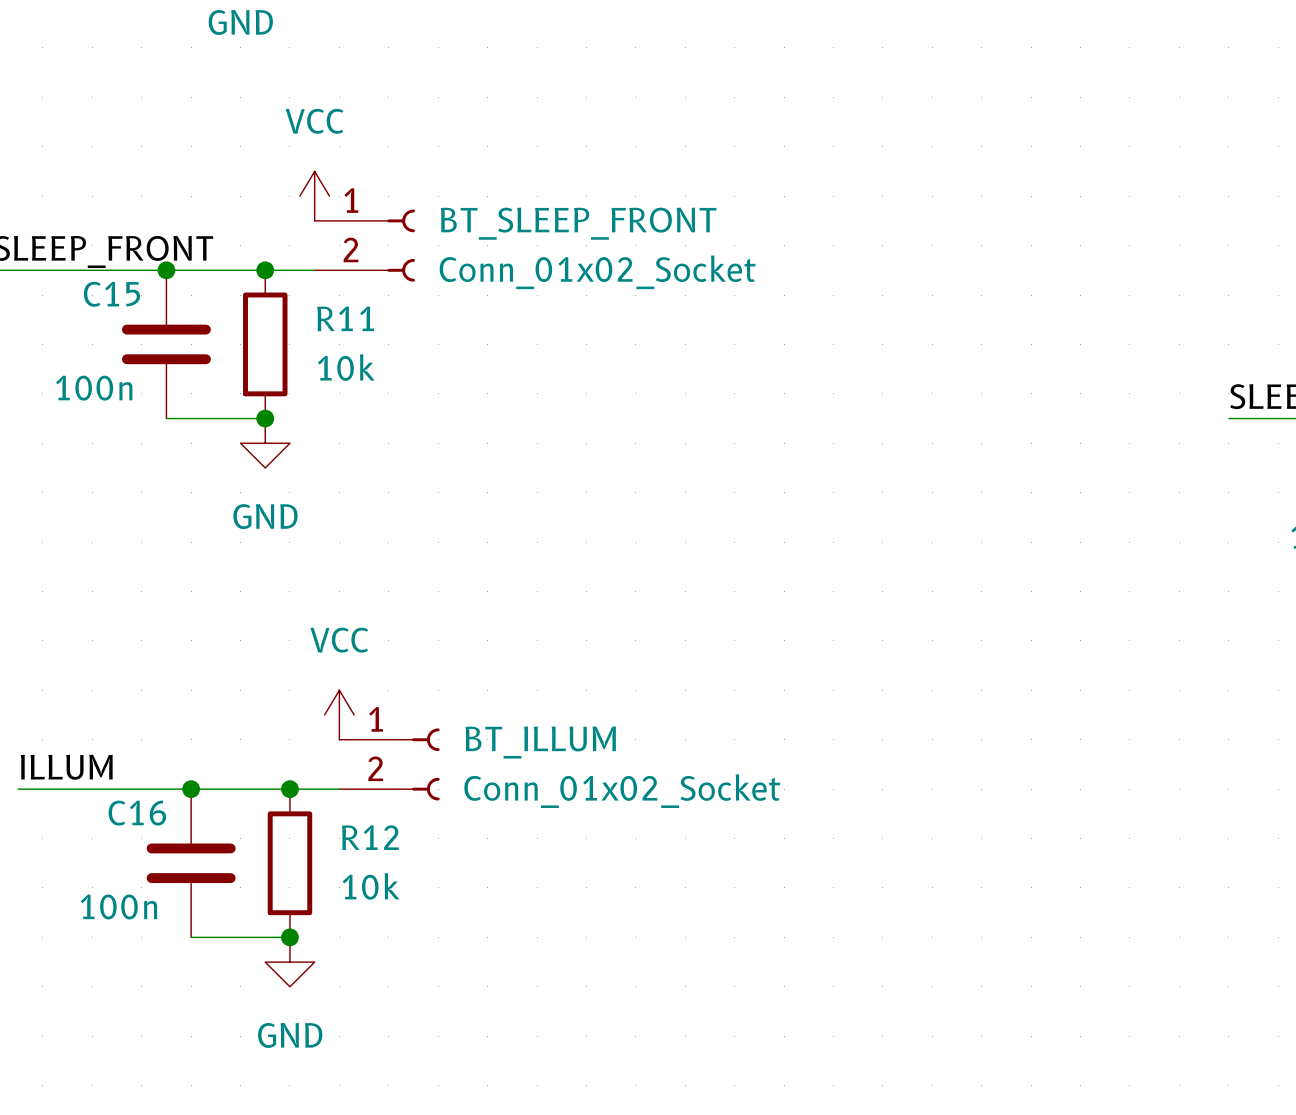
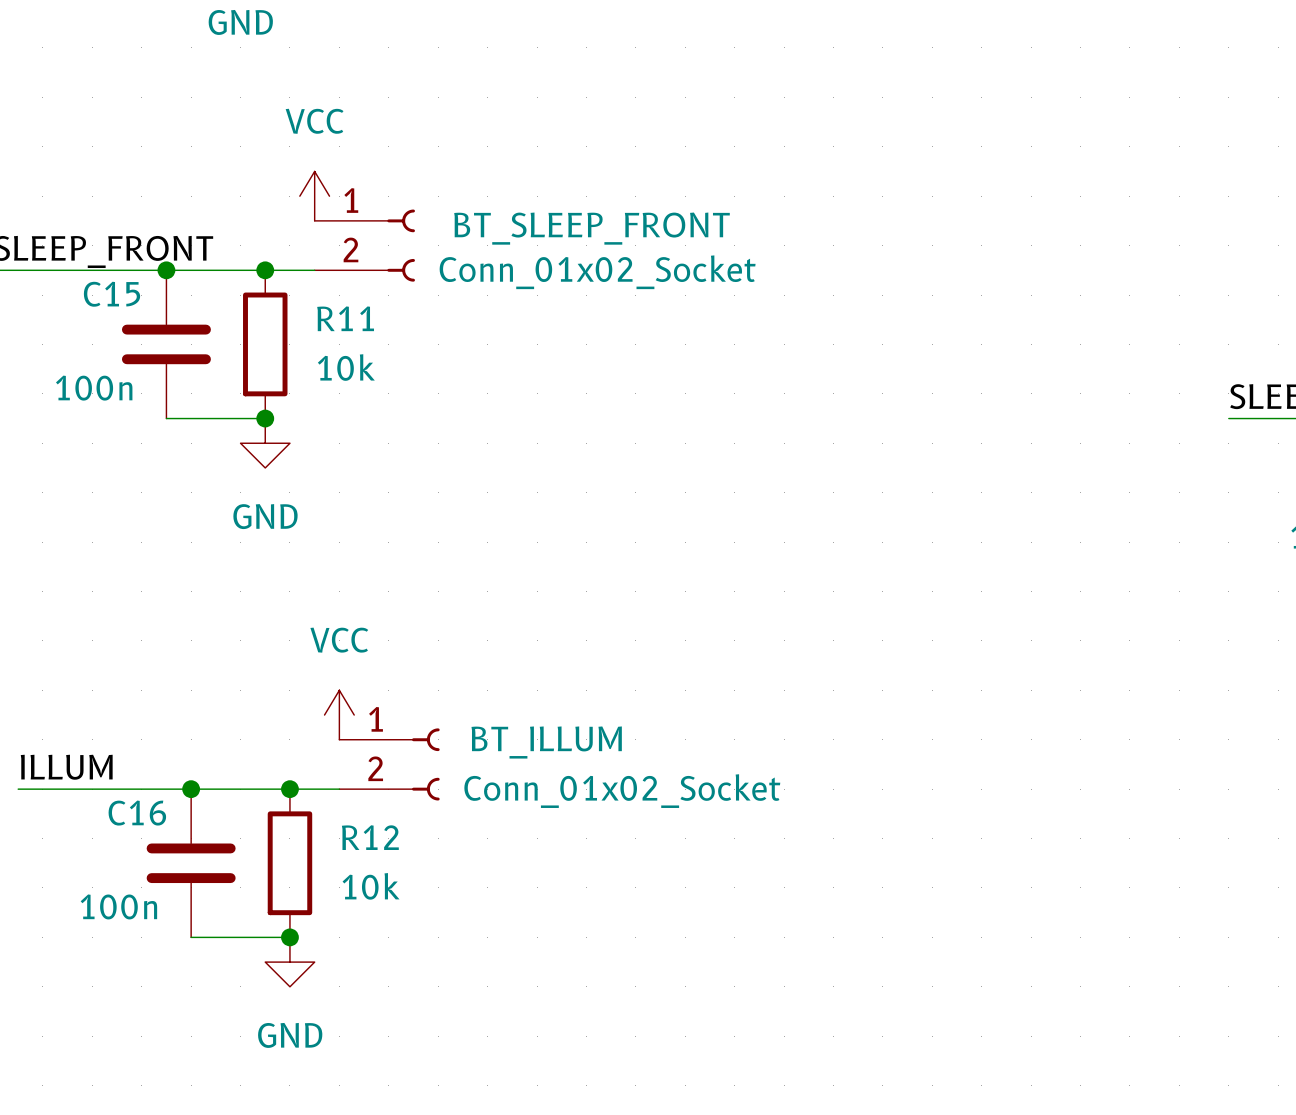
BT_SLEEP_FRONT name: BT_SLEEP_FRONT (578, 223) -> none
BT_SLEEP_FRONT text: none -> BT_SLEEP_FRONT (591, 228)
BT_ILLUM name: BT_ILLUM (540, 742) -> none
BT_ILLUM text: none -> BT_ILLUM (546, 742)

